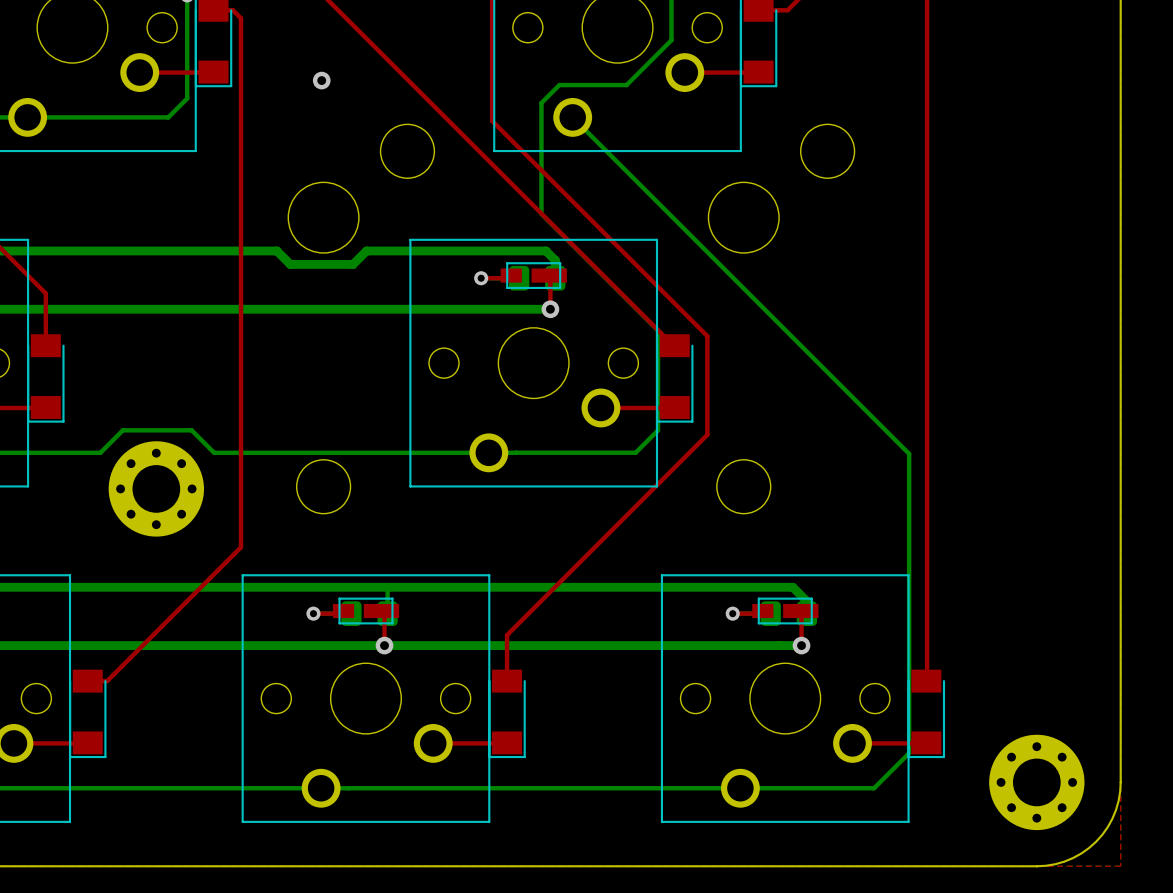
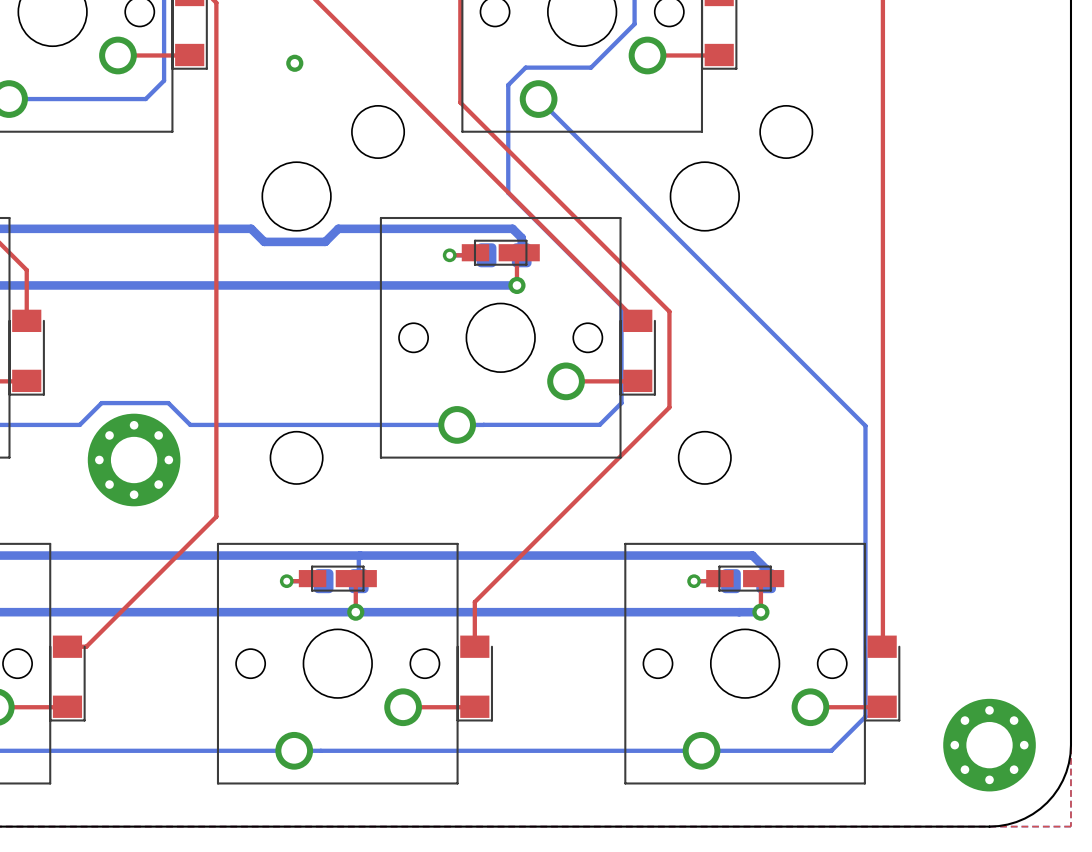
part footprint: [500, 262, 567, 290] -> [461, 239, 540, 266]
part footprint: [332, 597, 400, 625] -> [298, 565, 377, 592]
part footprint: [752, 597, 819, 625] -> [706, 565, 785, 592]

